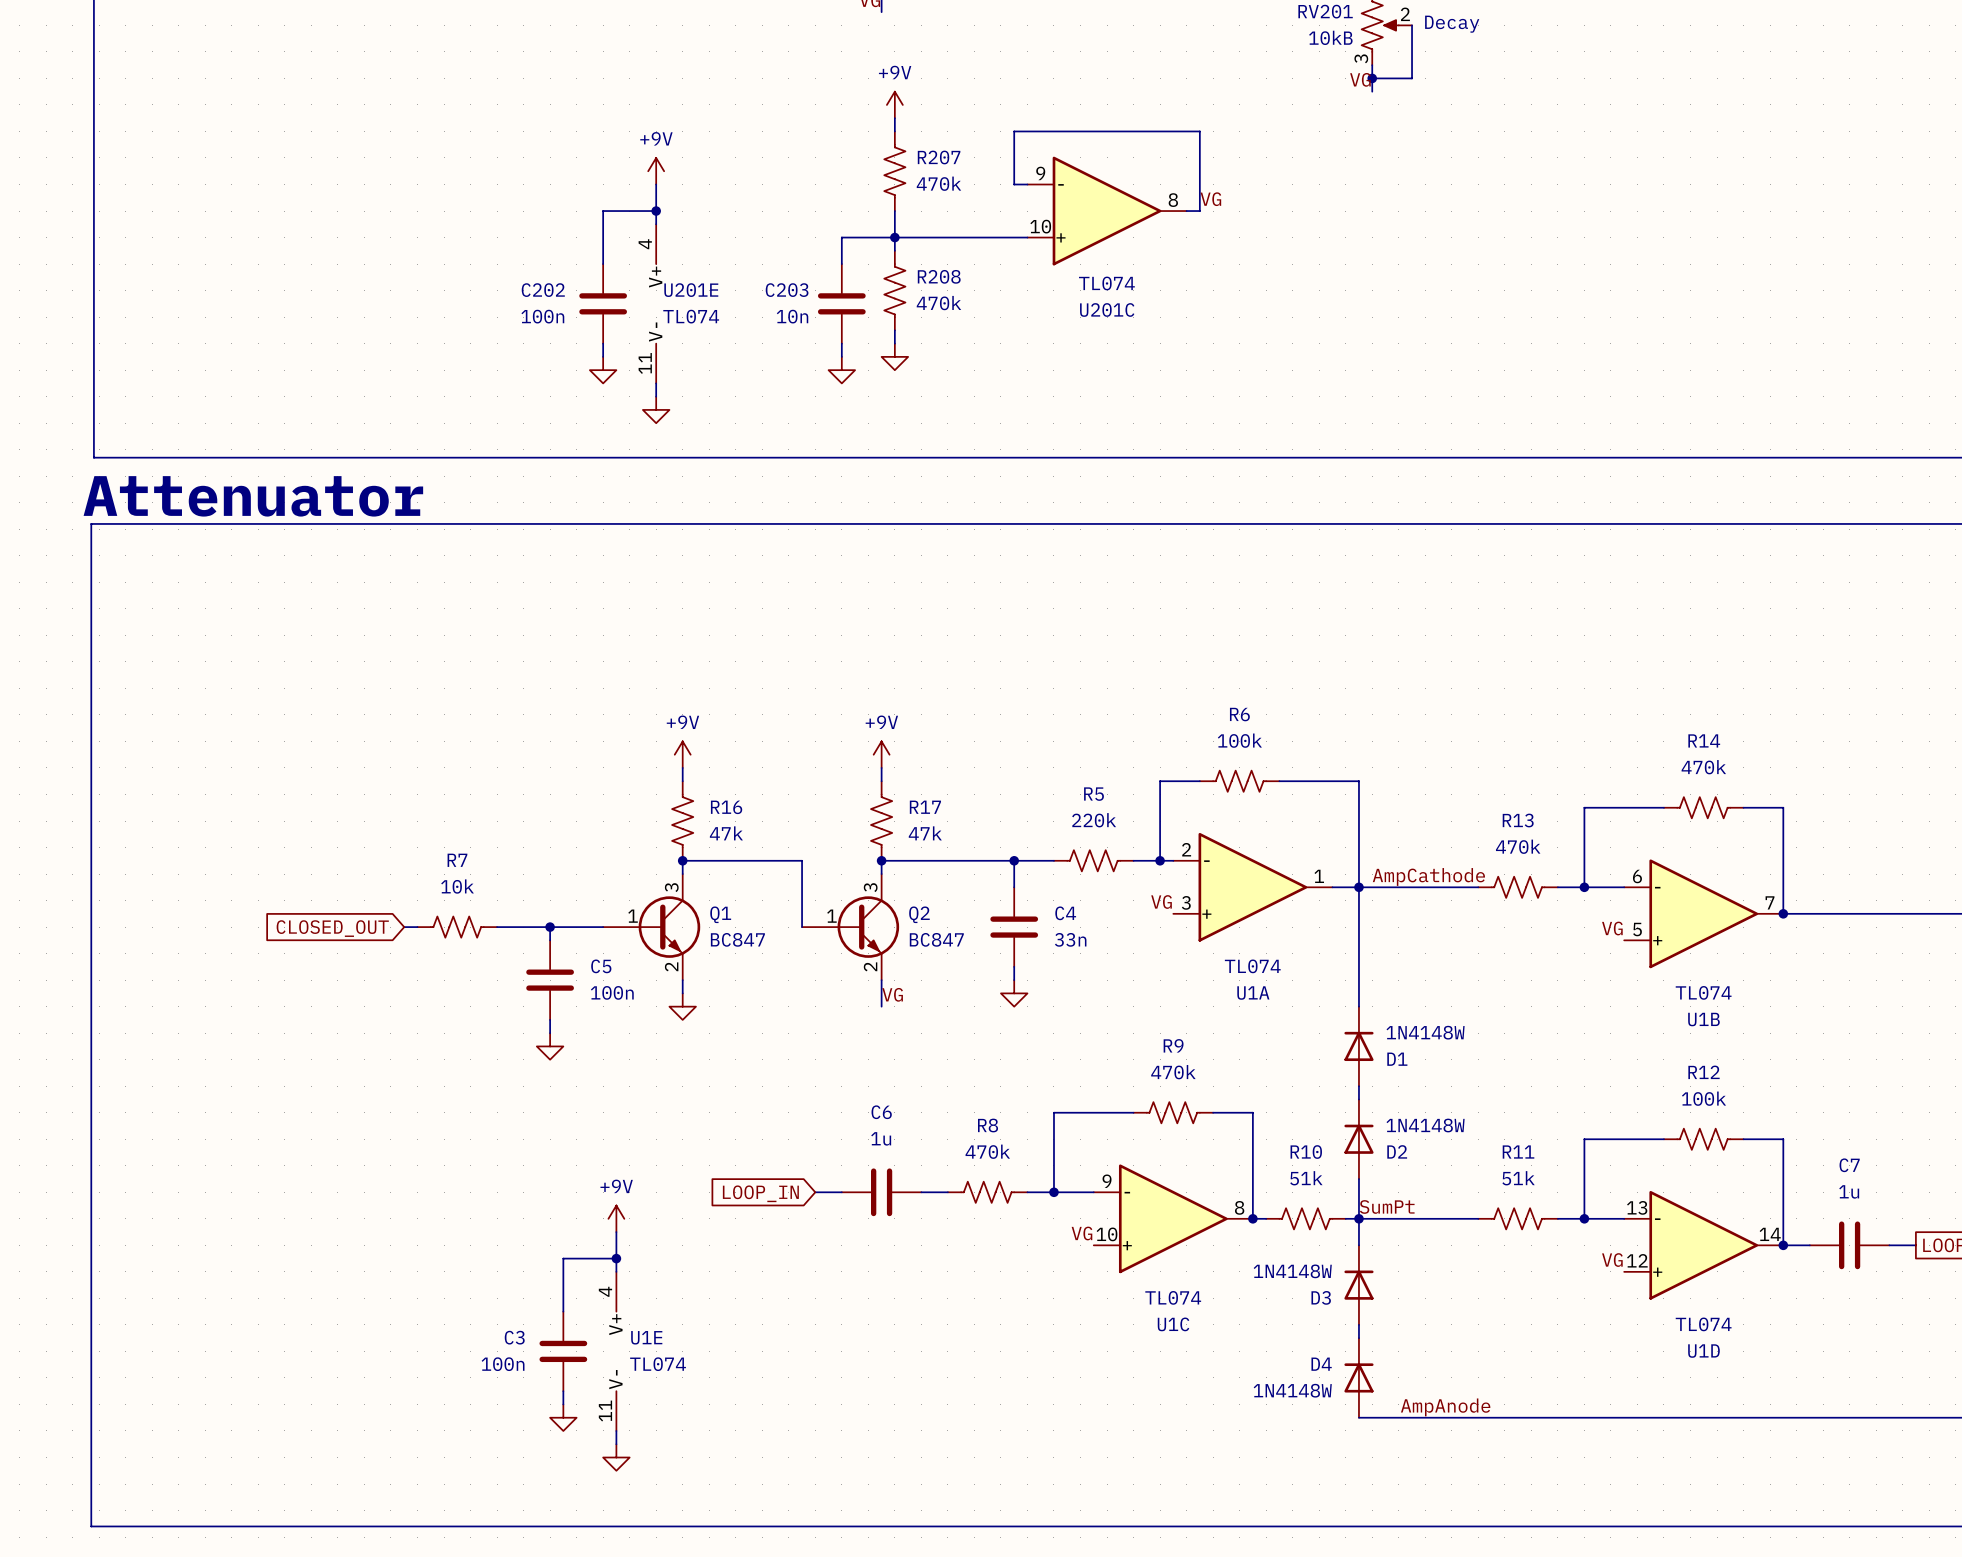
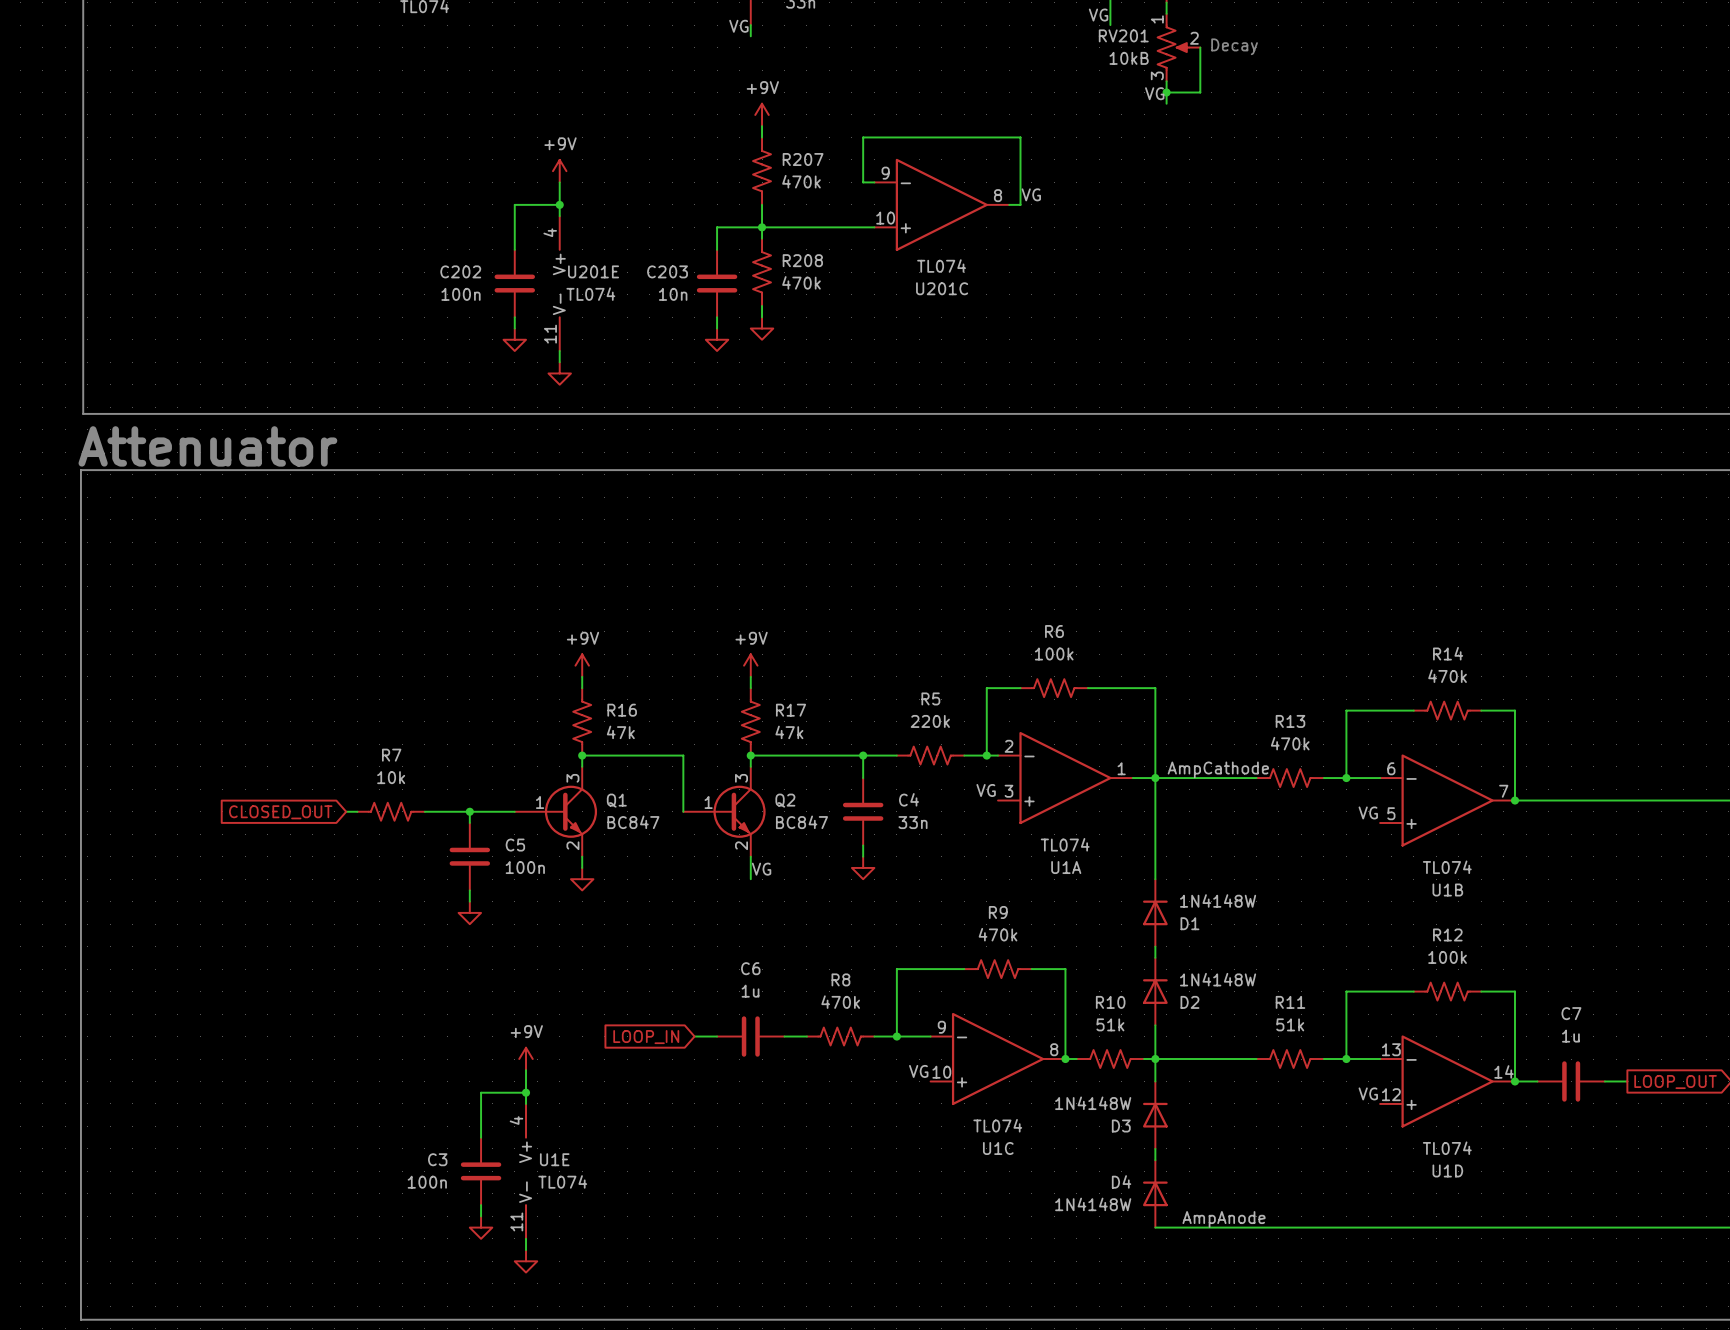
label: SumPt (1387, 1206) -> none

